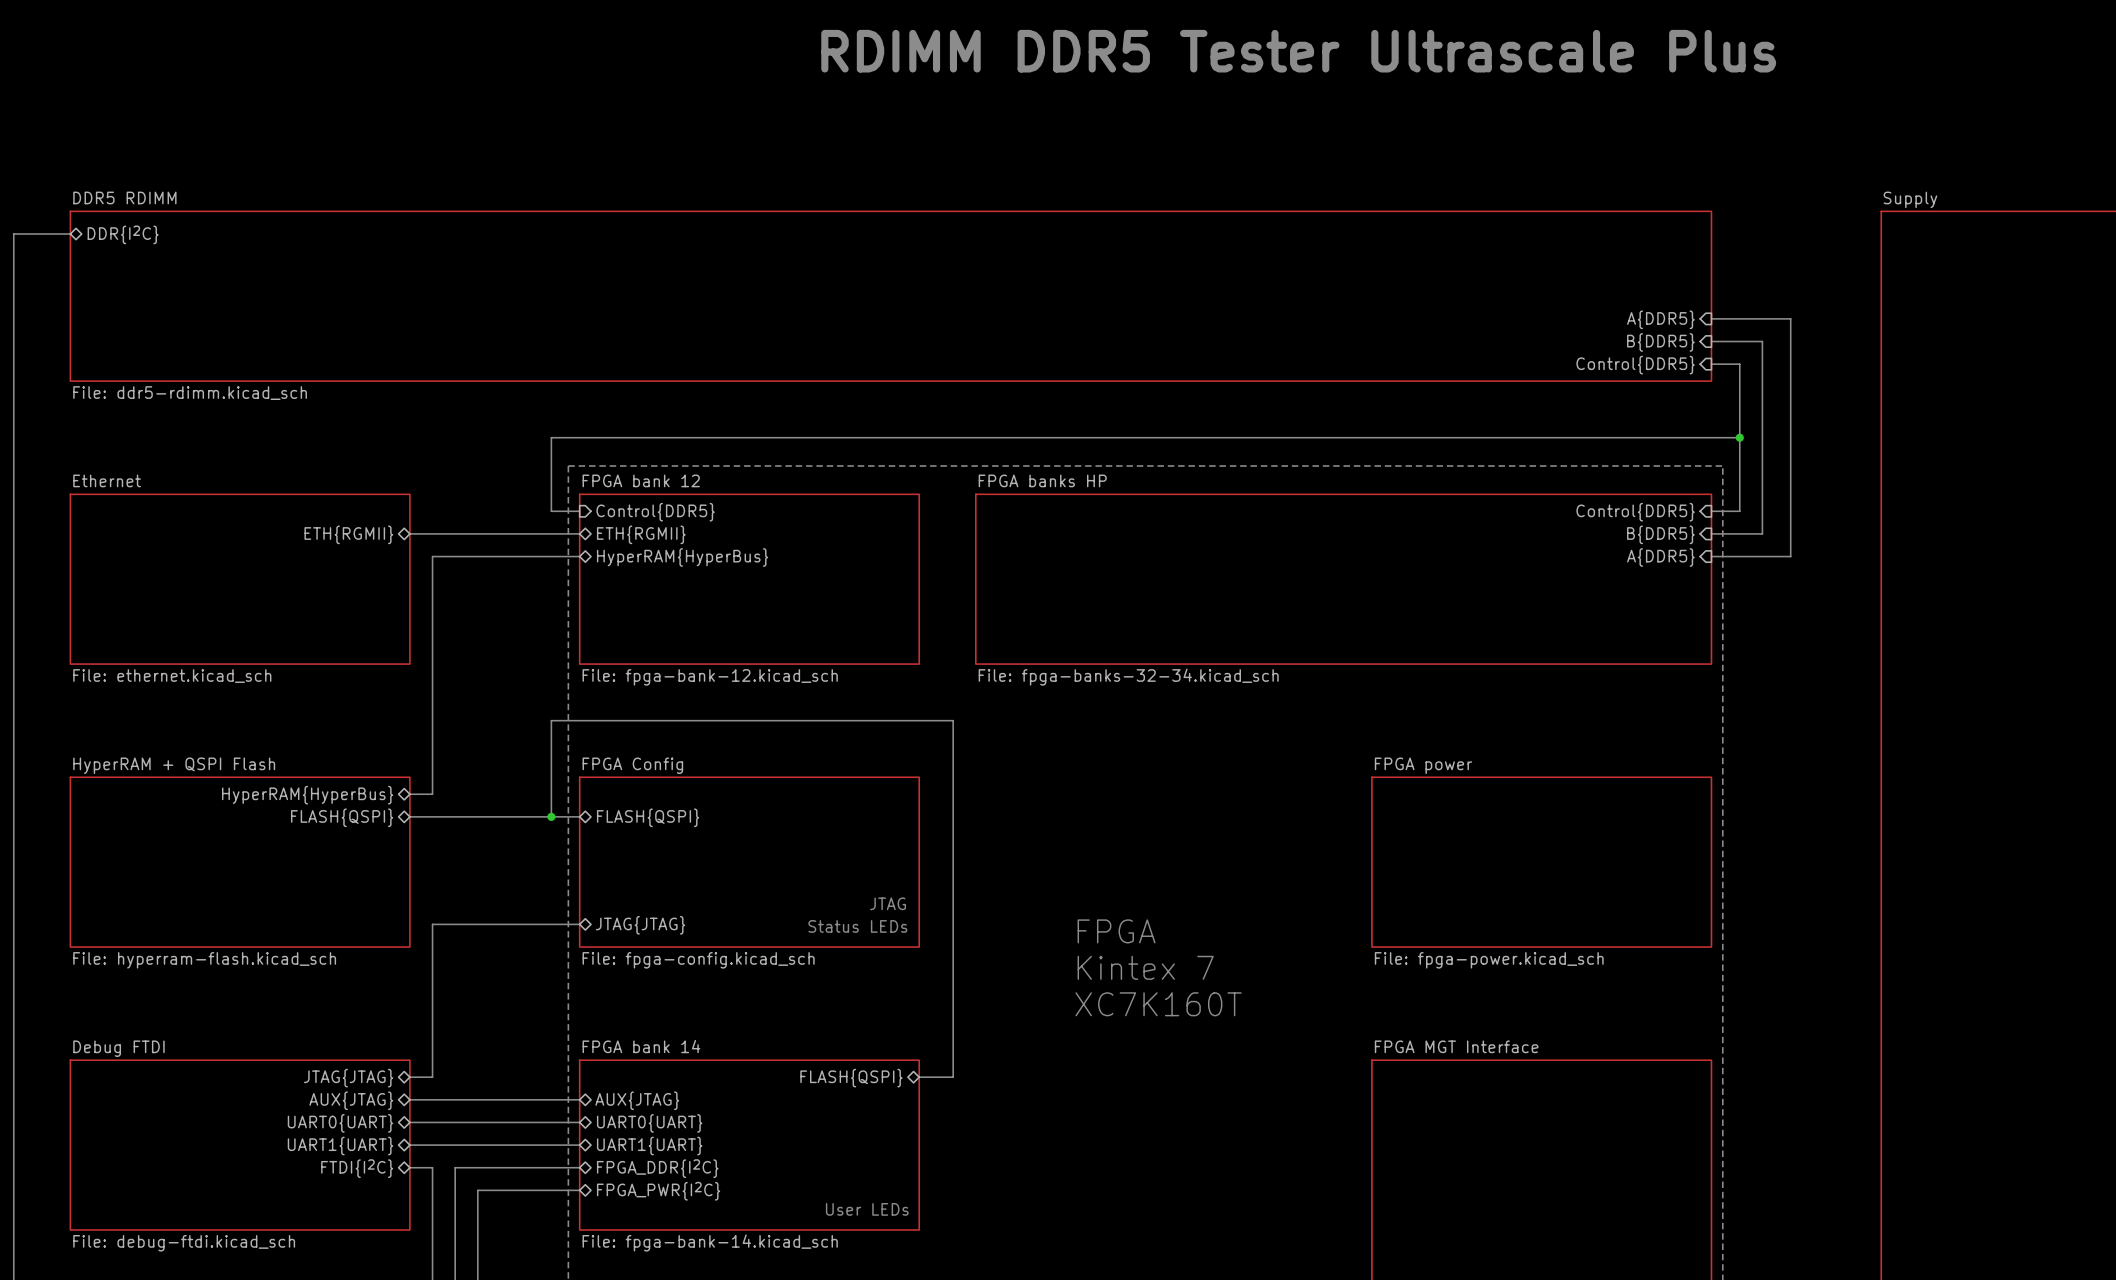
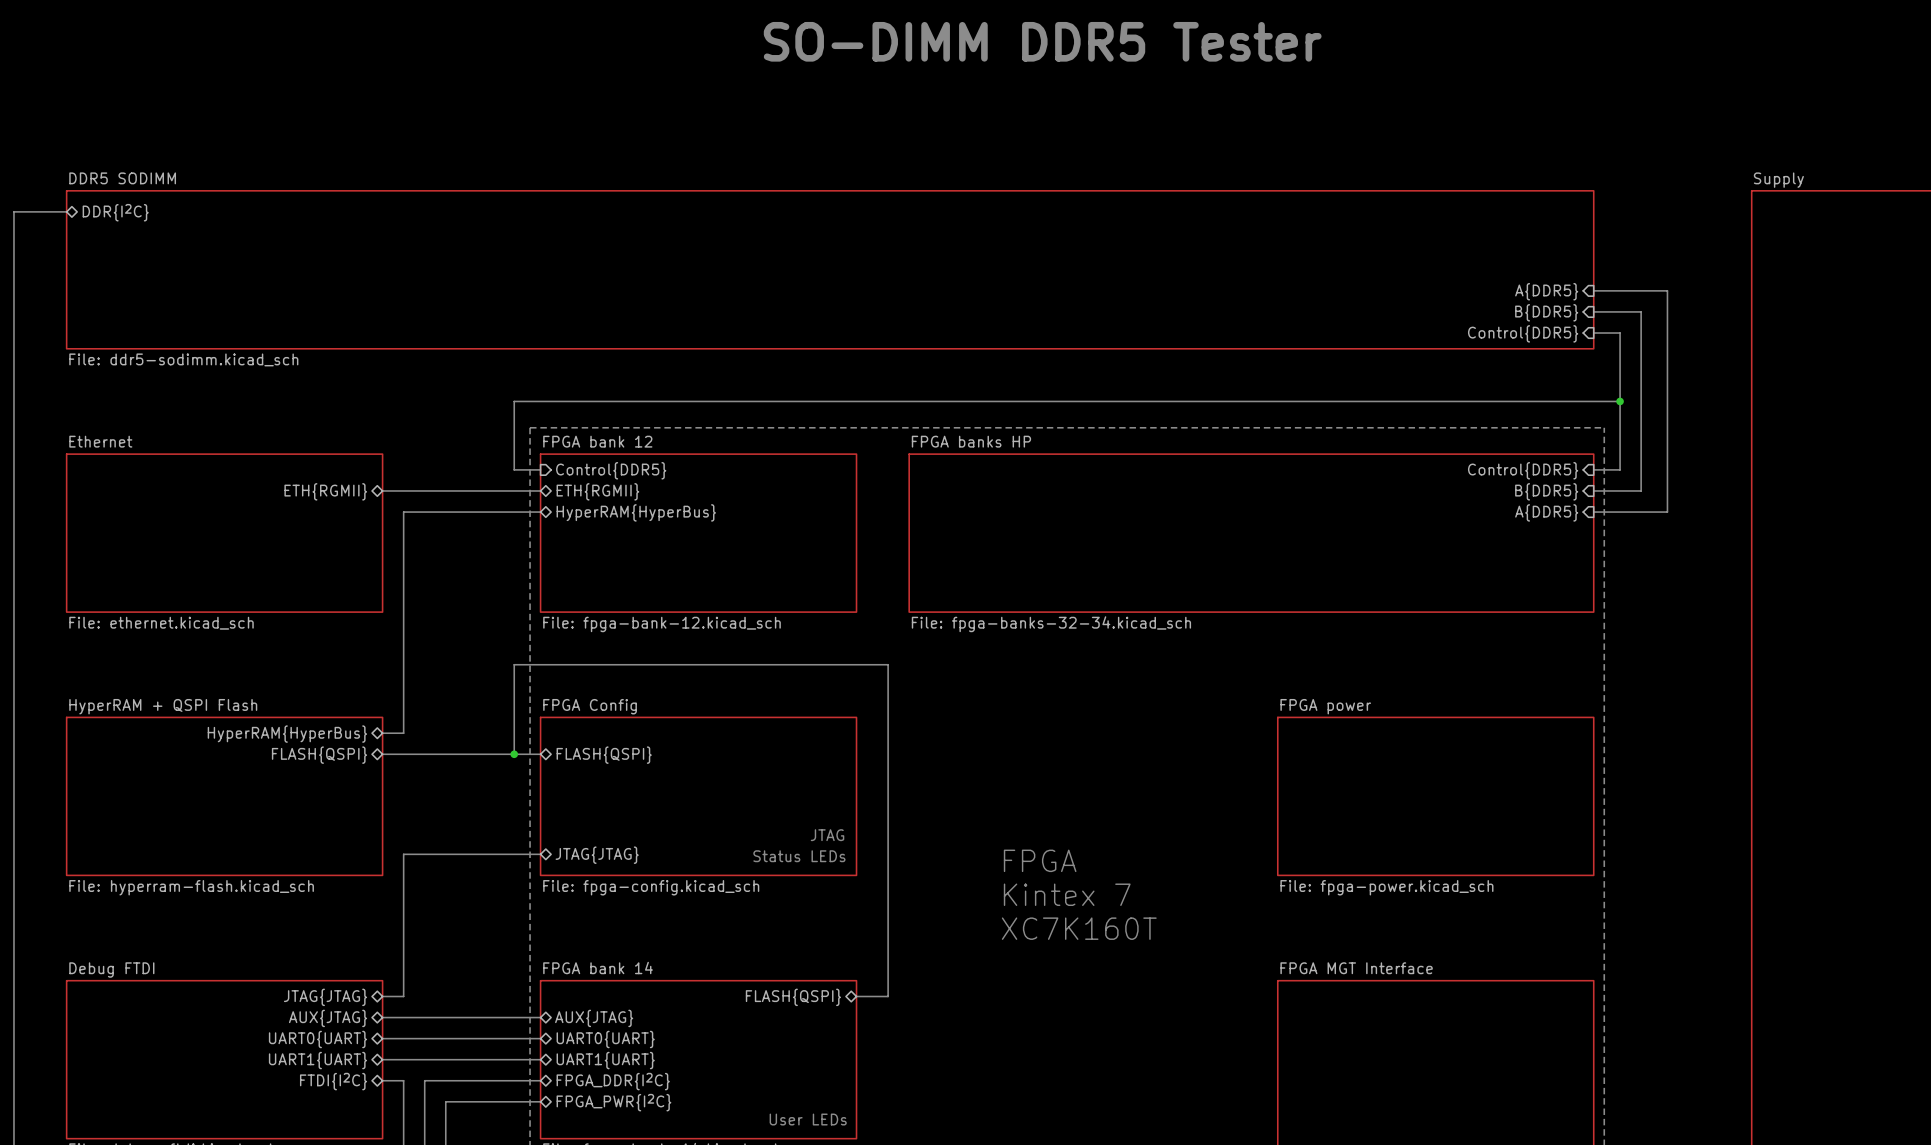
text: RDIMM DDR5 Tester Ultrascale Plus (1298, 51) -> SO-DIMM DDR5 Tester (1042, 41)
sheet DDR5 RDIMM name: DDR5 RDIMM (124, 197) -> DDR5 SODIMM (122, 178)
sheet DDR5 RDIMM value: File: ddr5-rdimm.kicad_sch (190, 393) -> File: ddr5-sodimm.kicad_sch (183, 359)

